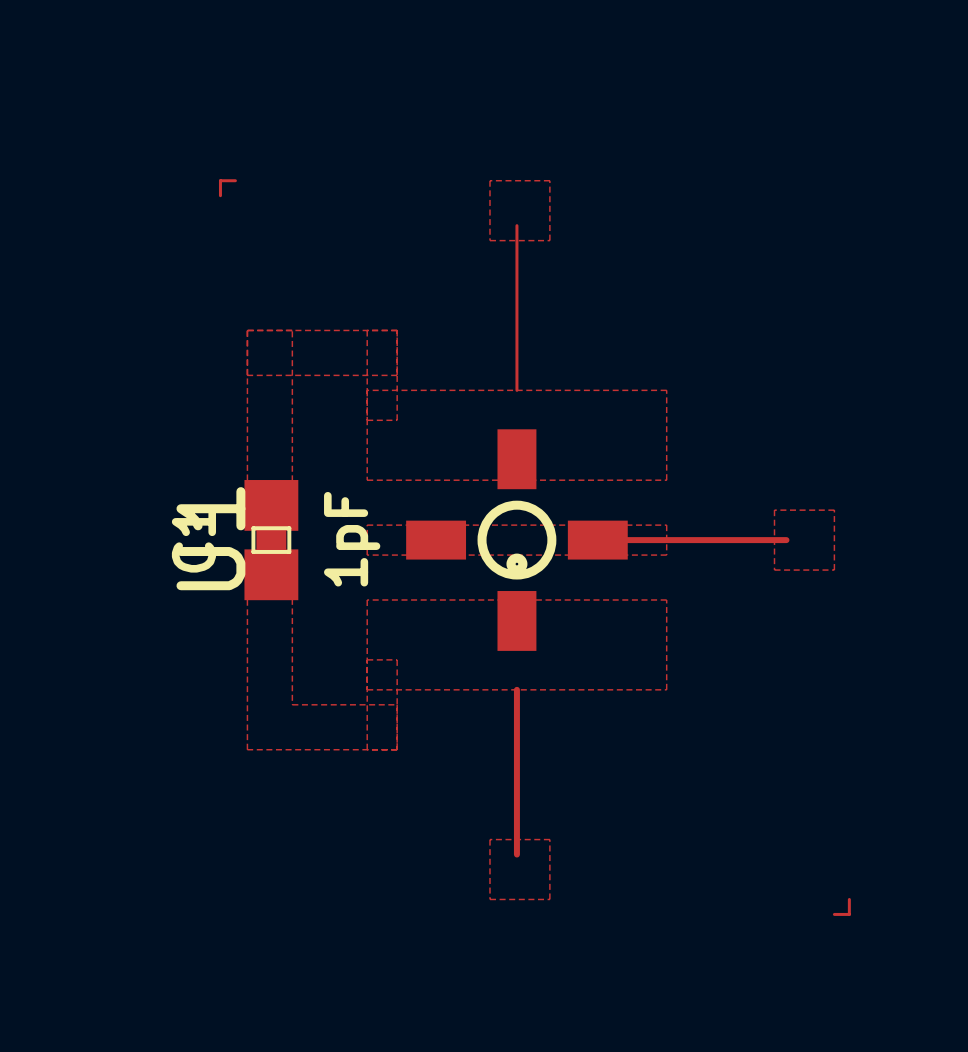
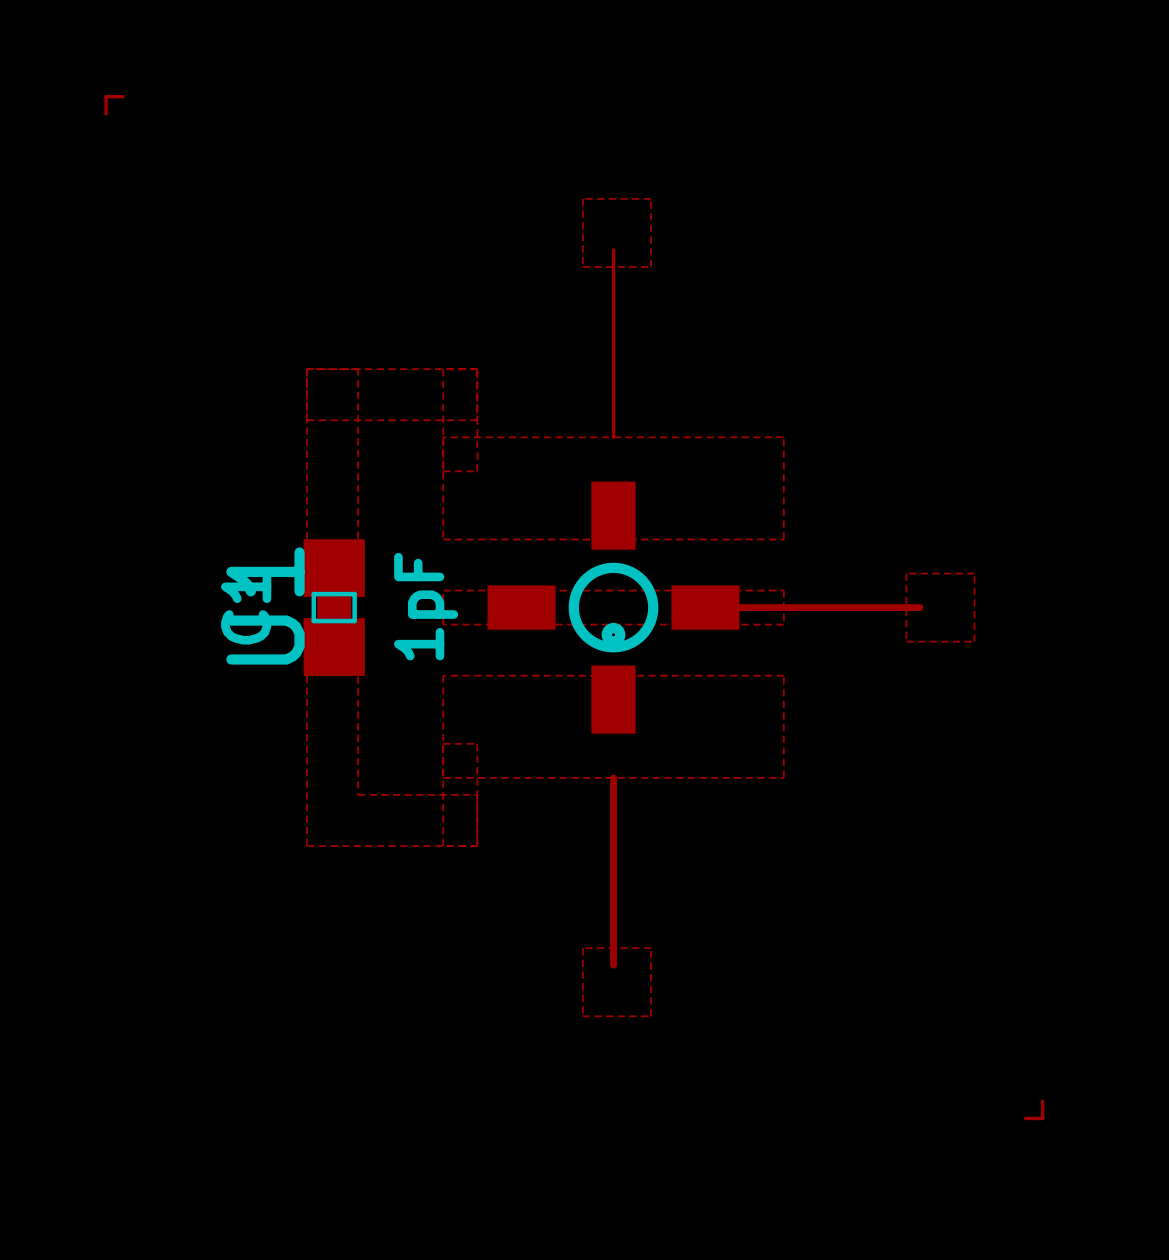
top track: (235, 180) (220, 180) (220, 195) -> (123, 96) (106, 96) (106, 113)
top track: (849, 899) (849, 914) (834, 914) -> (1042, 1101) (1042, 1118) (1025, 1118)

